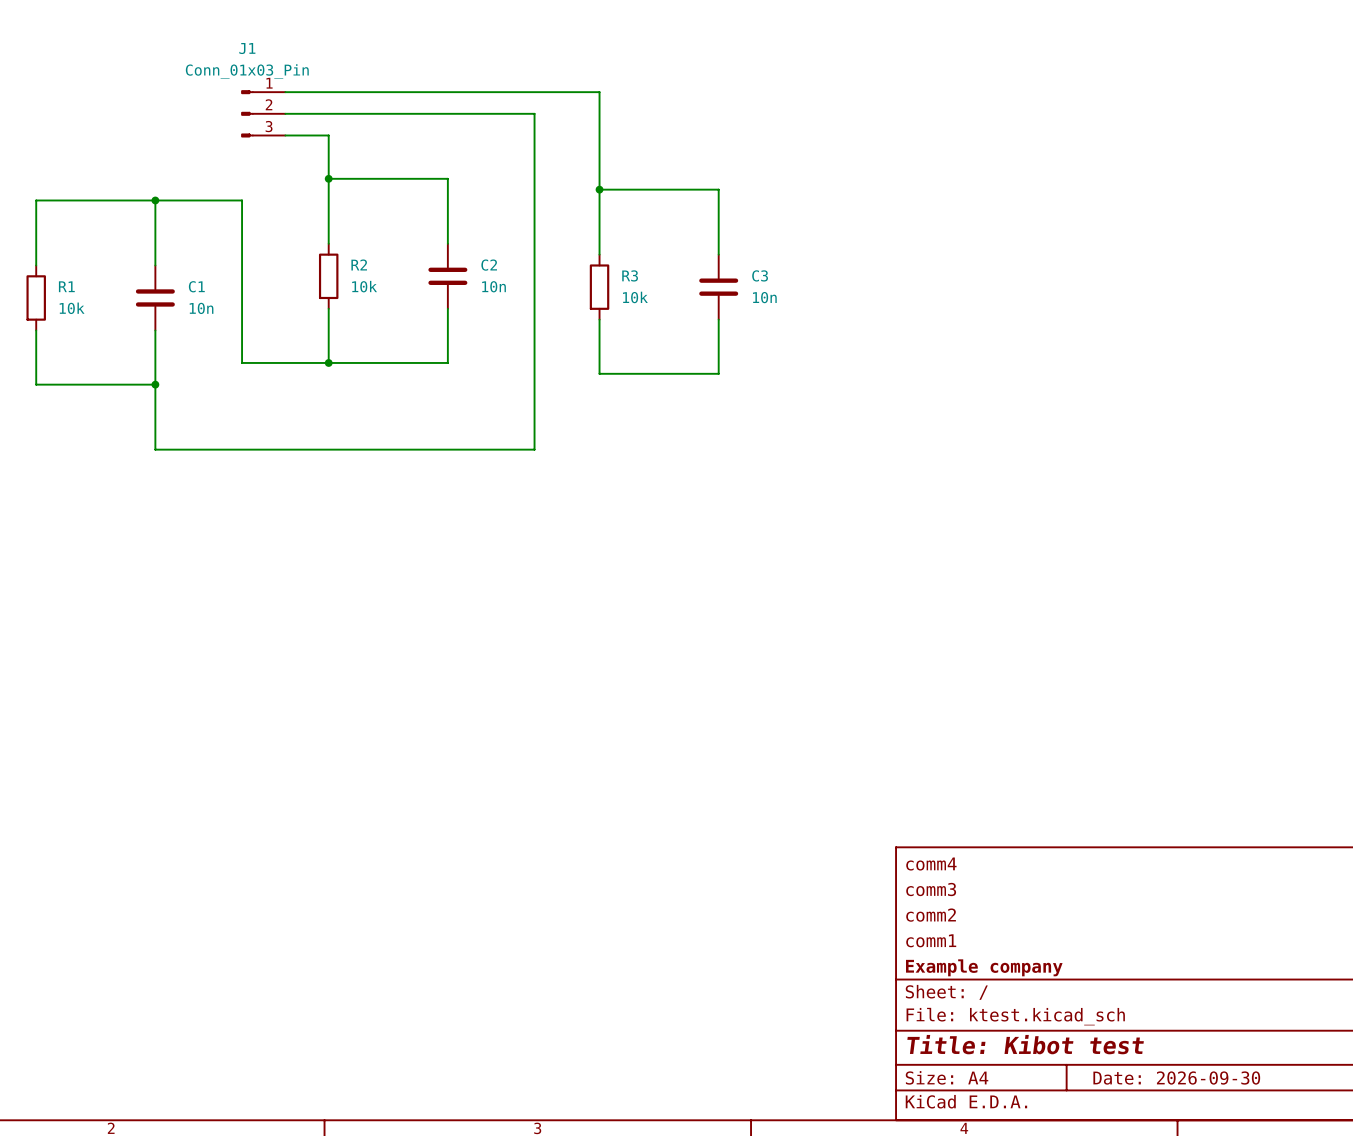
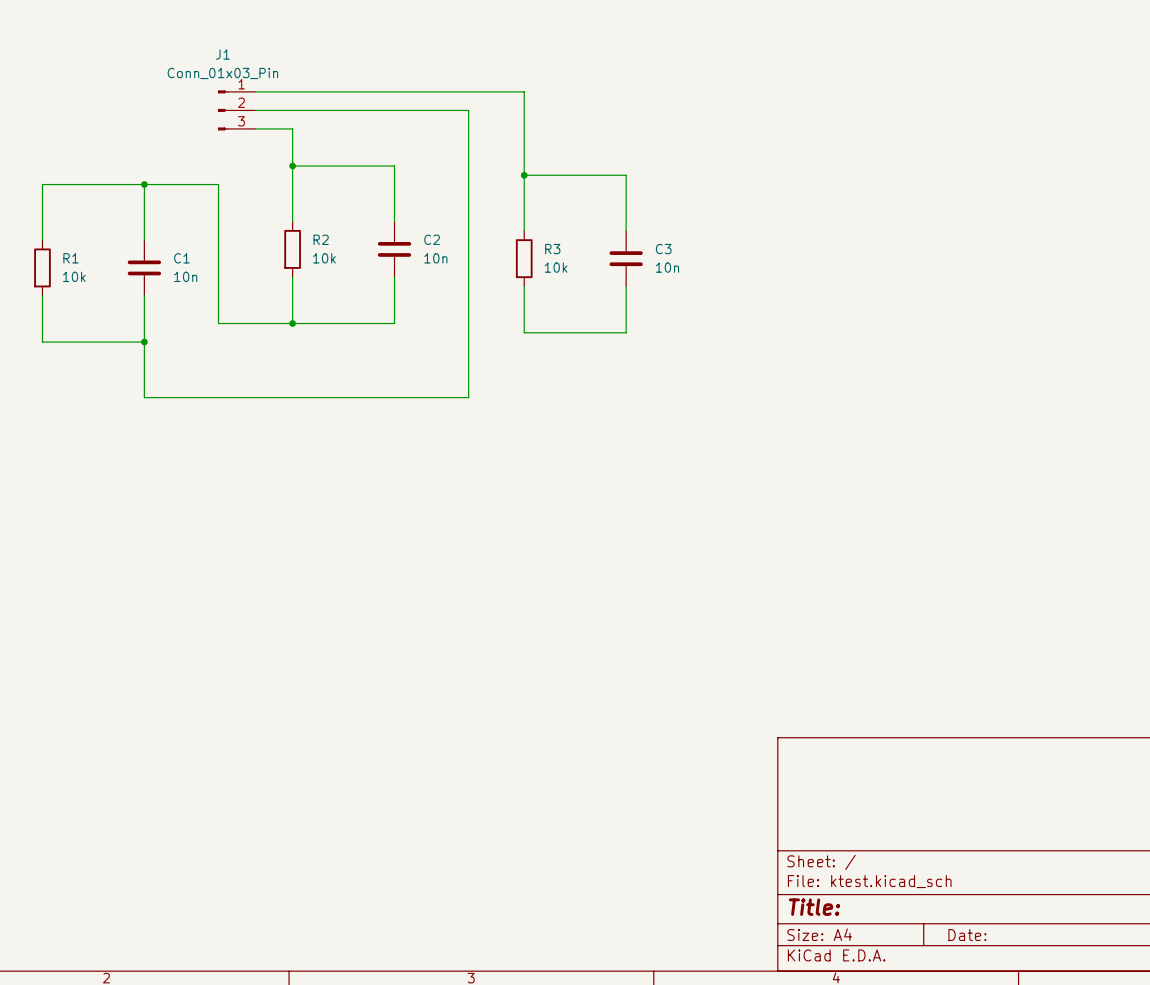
title block: comm4 (931, 864) -> none
title block: comm3 (931, 889) -> none
title block: comm2 (931, 915) -> none
title block: comm1 (931, 940) -> none
title block: Example company (984, 967) -> none
title block: Title: Kibot test (1025, 1044) -> Title: (814, 907)
title block: Date: 2026-09-30 (1176, 1078) -> Date: (967, 935)

